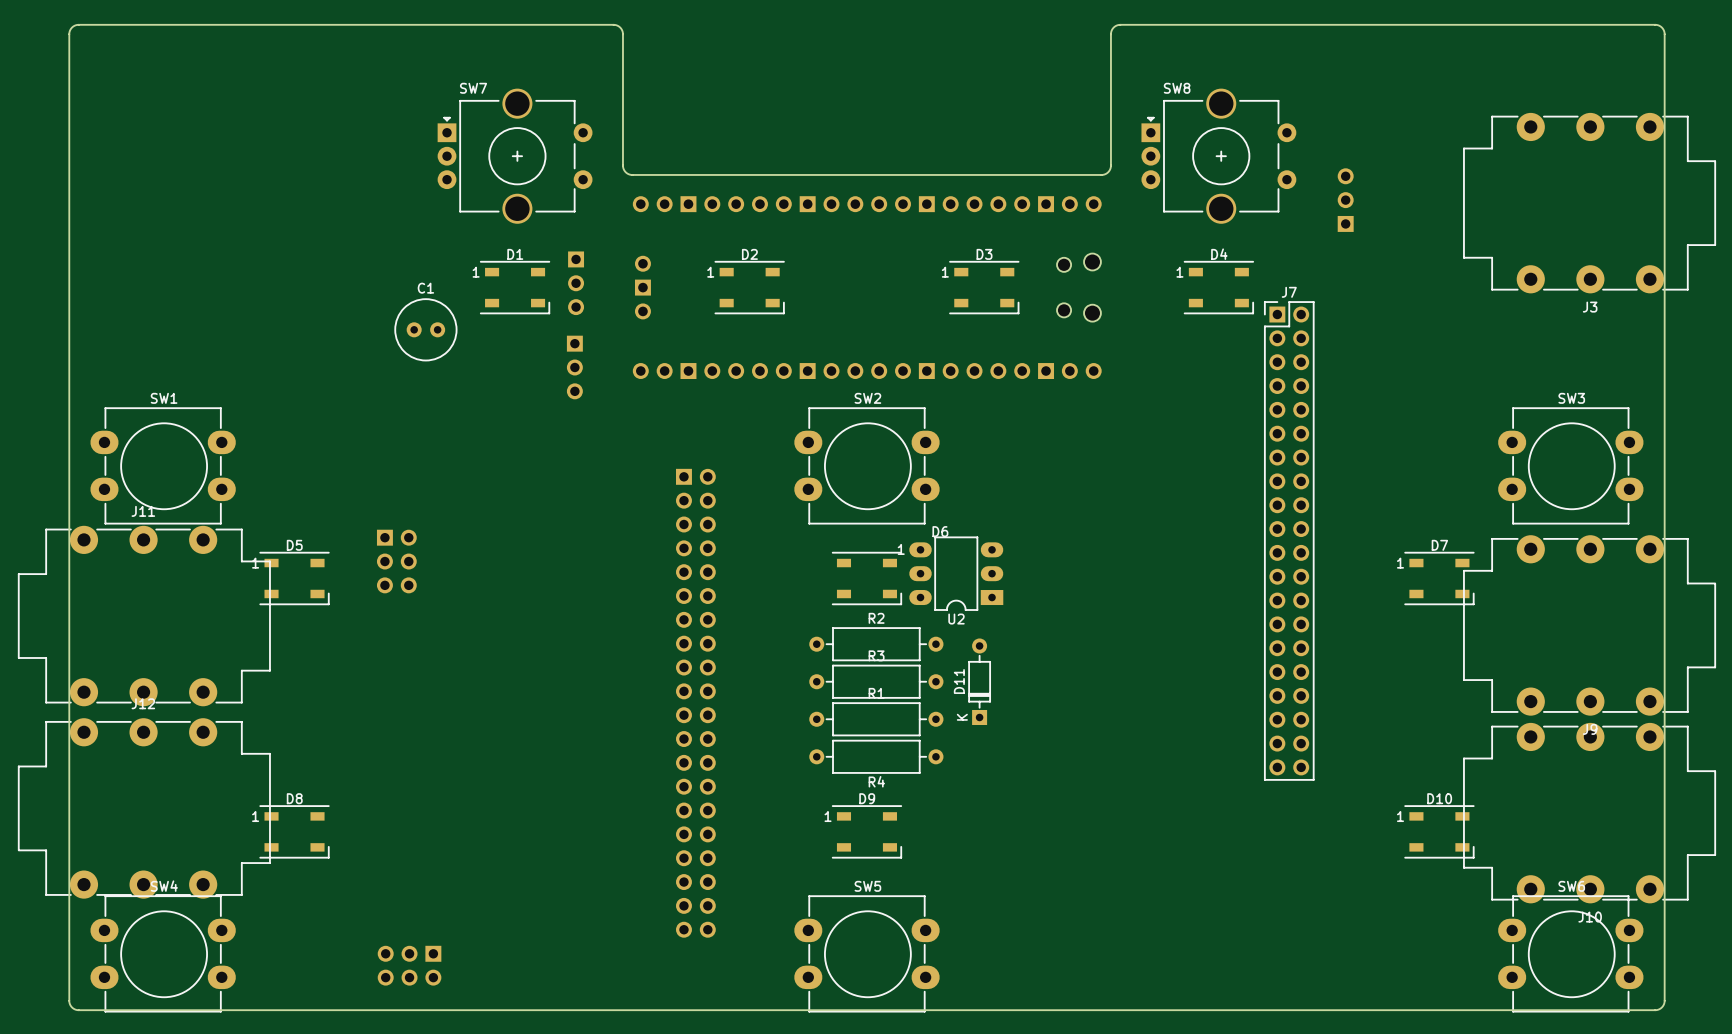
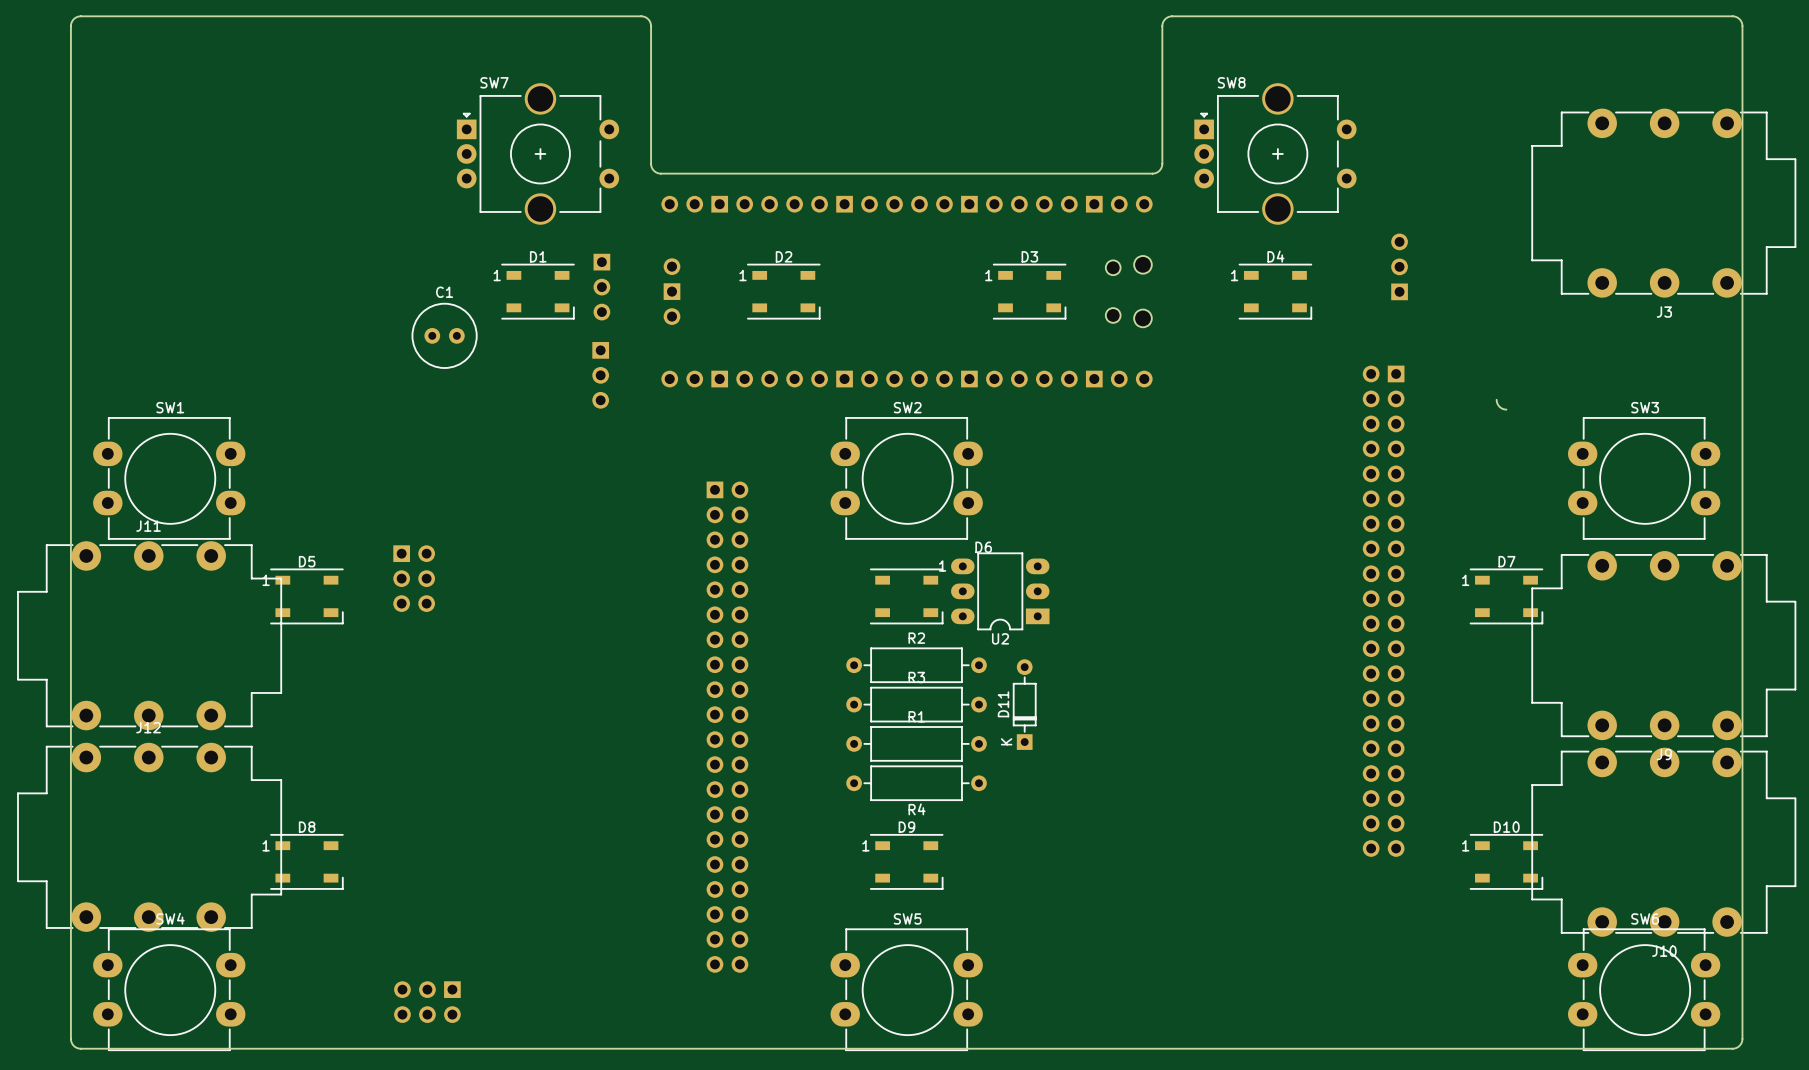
part position: (1345, 200) -> (1399, 266)
board edge: none -> (1496, 399) (1499, 406) (1506, 409)
J7 side: top (1289, 540) -> bottom (1383, 611)

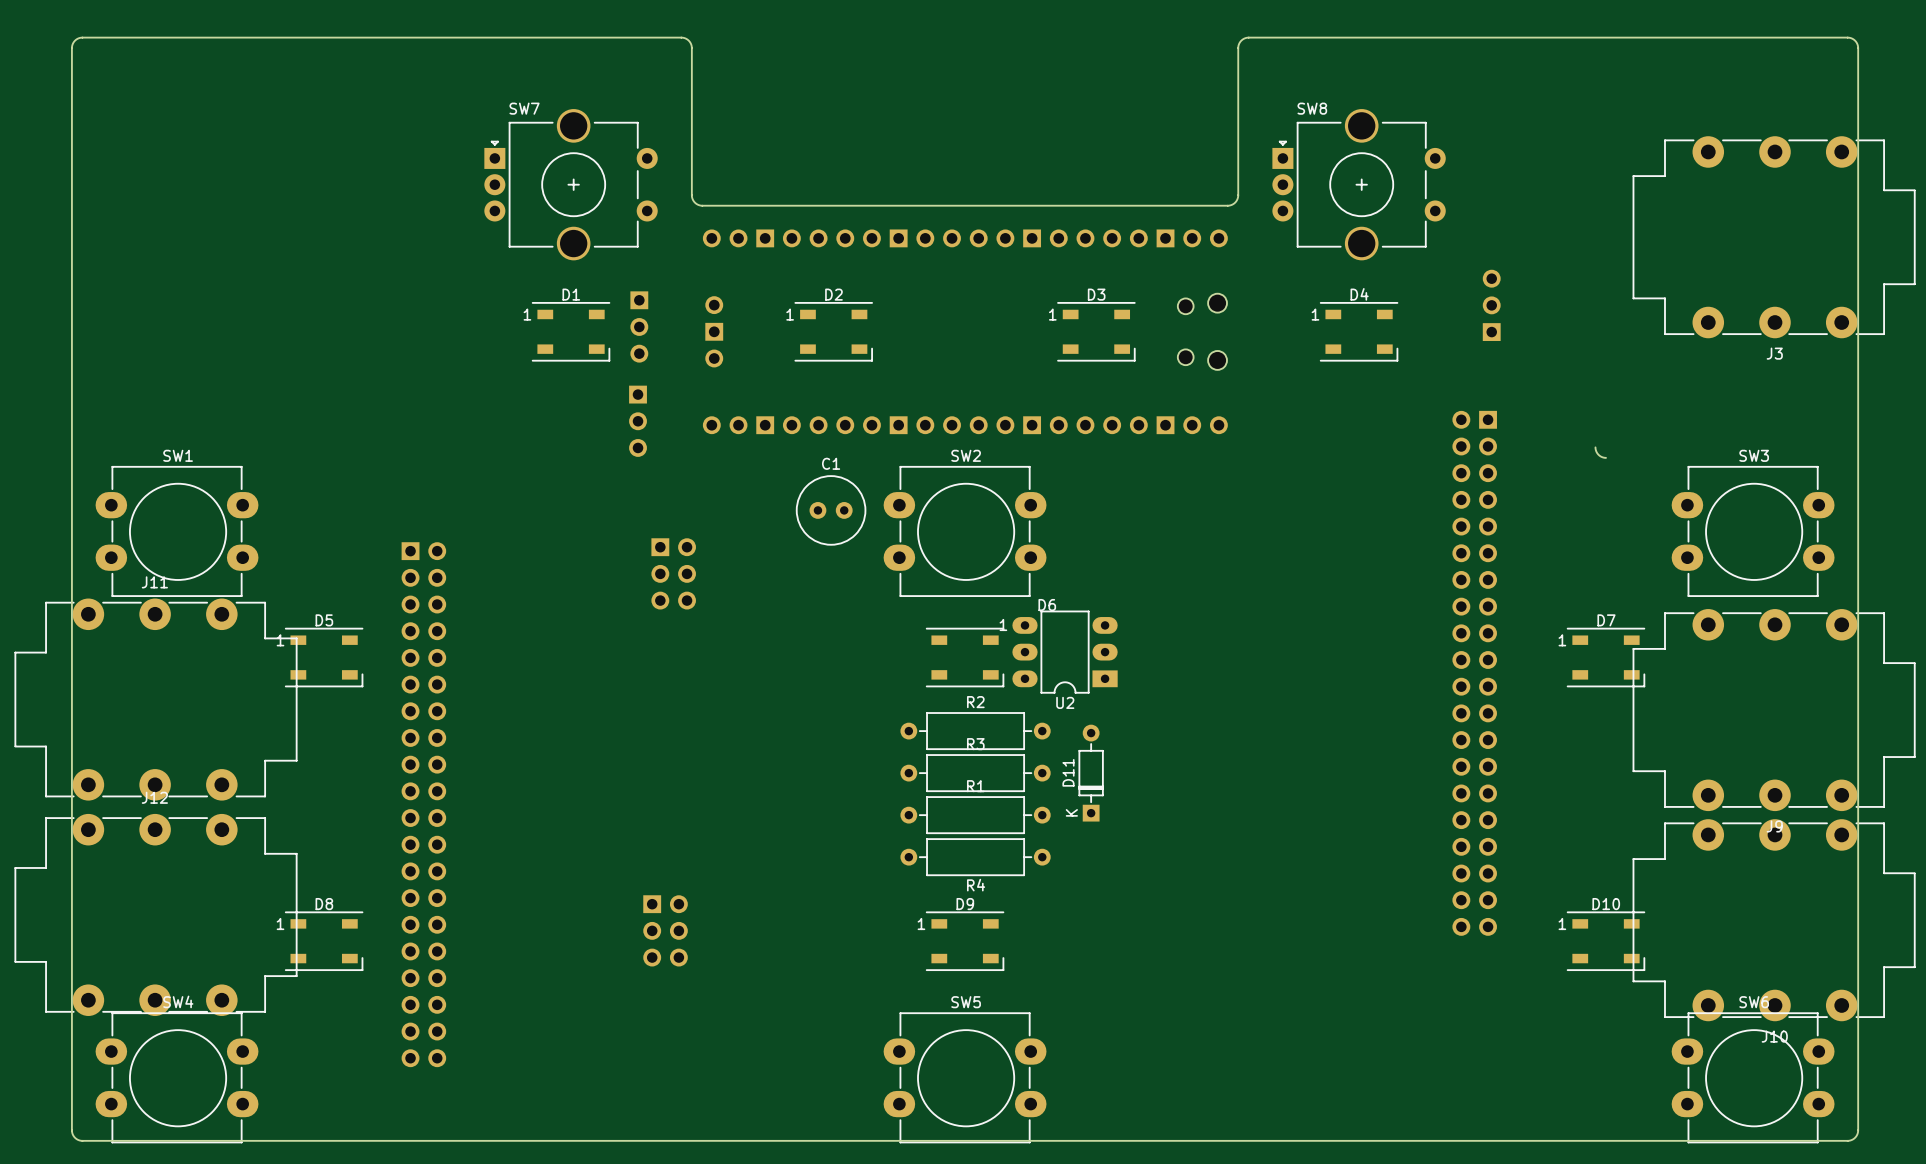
C1 position: (444, 335) -> (831, 510)
part: none -> (673, 573)
part: (414, 578) -> none
part: (727, 727) -> none
part: none -> (423, 804)
part: none -> (665, 930)
part: (427, 1002) -> none

